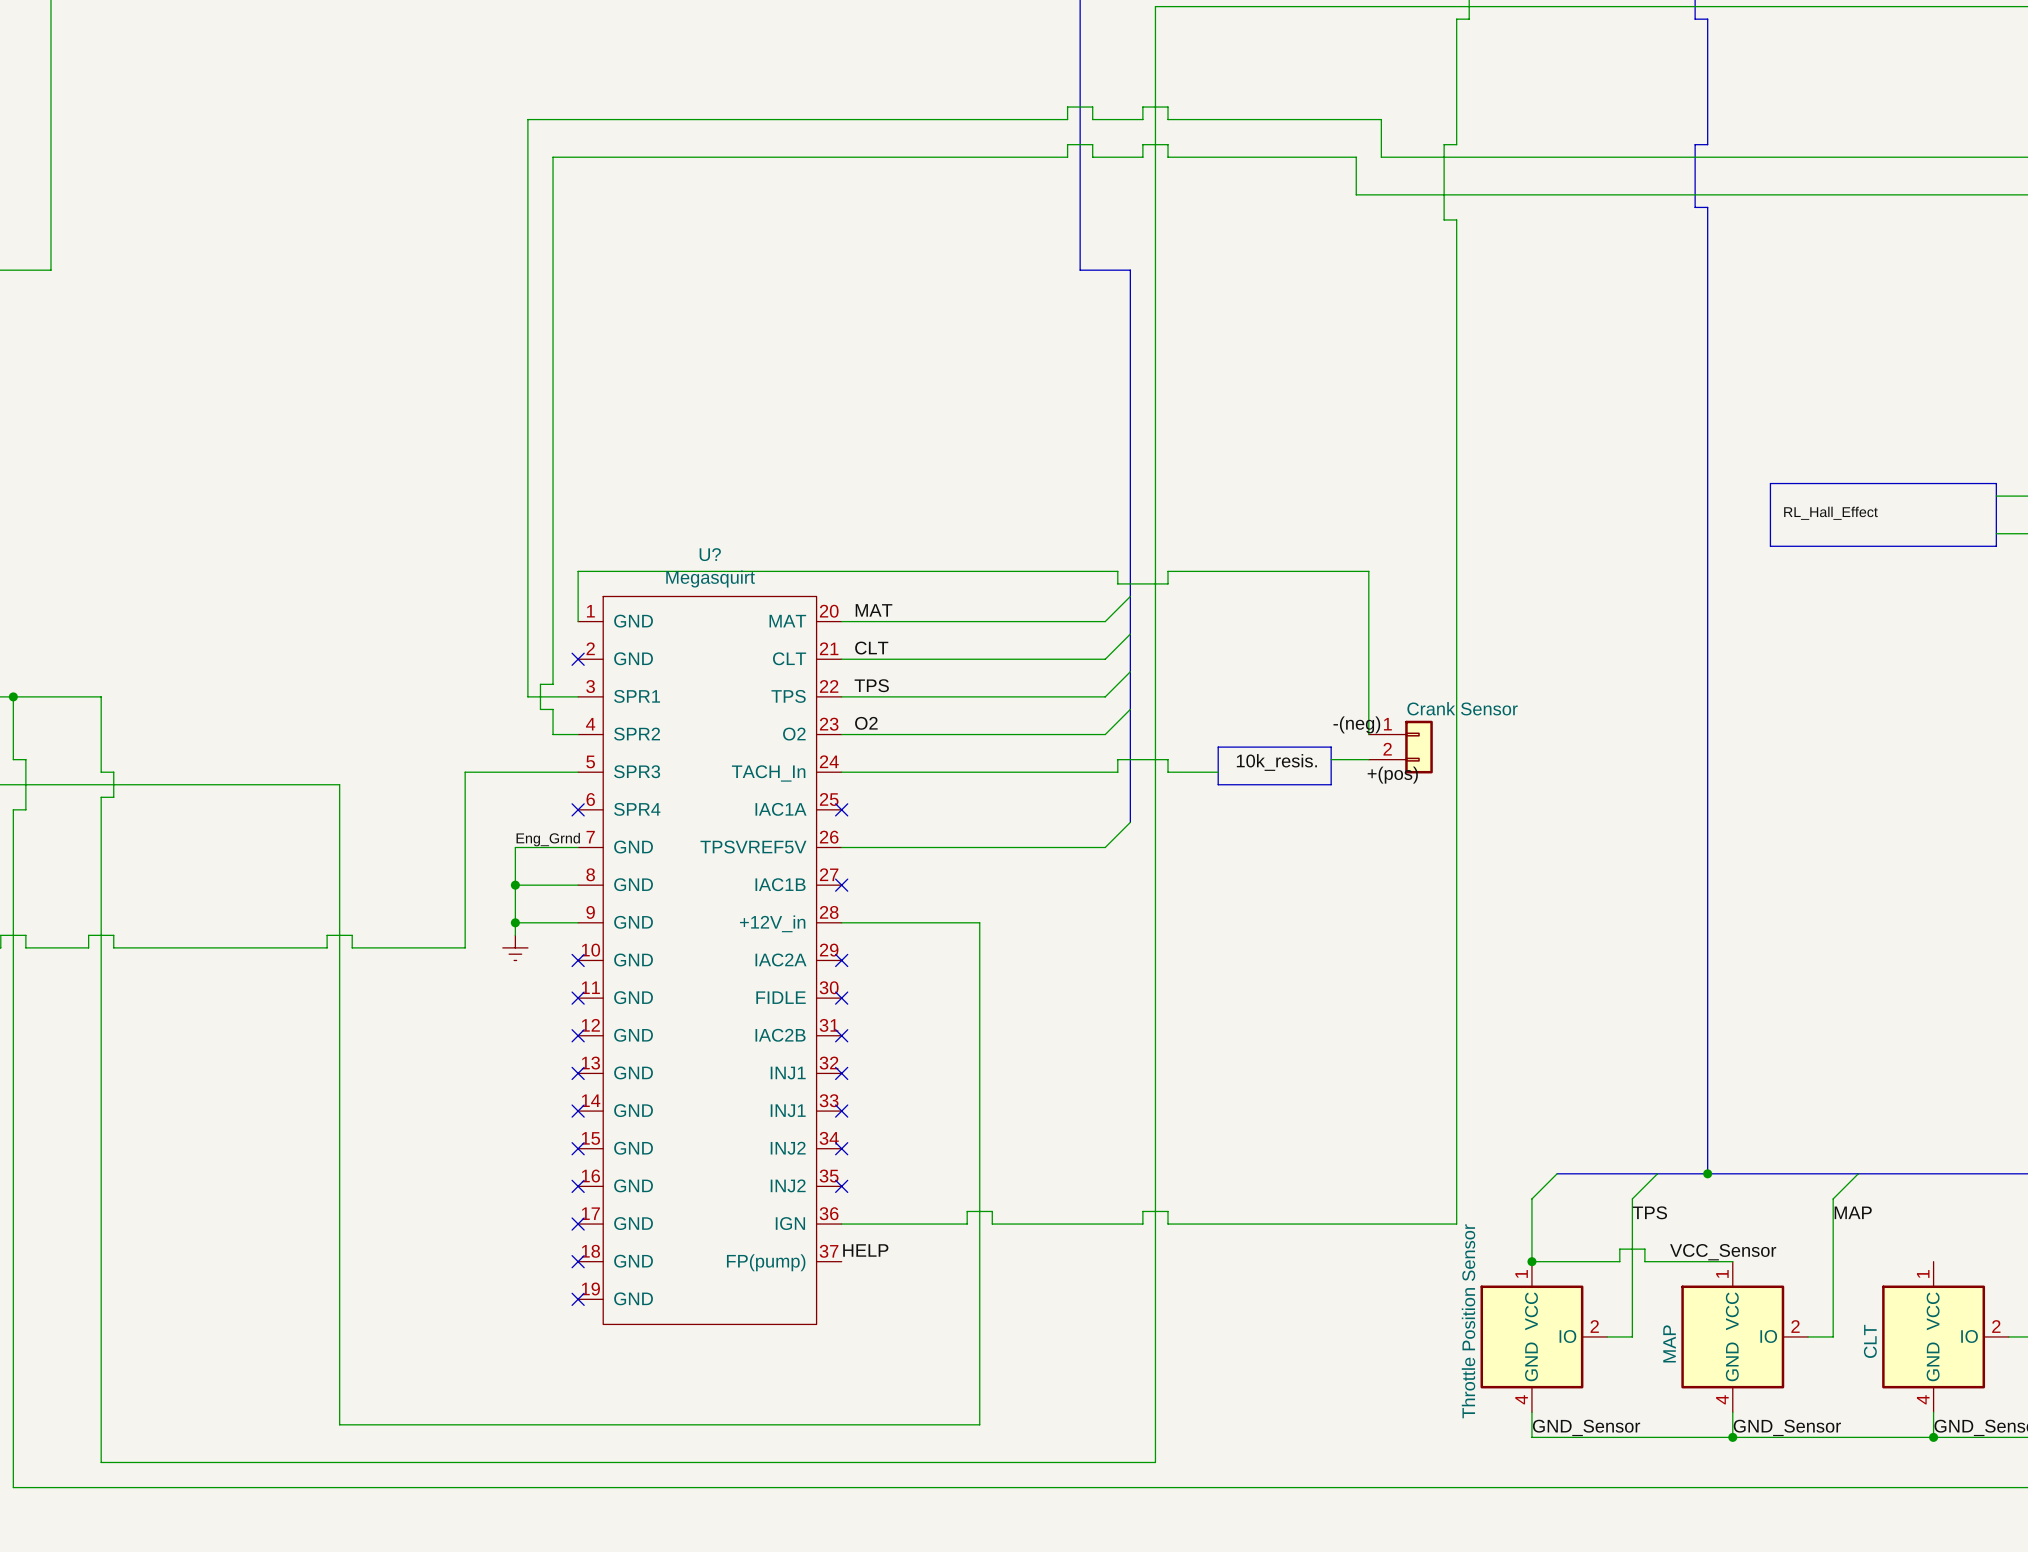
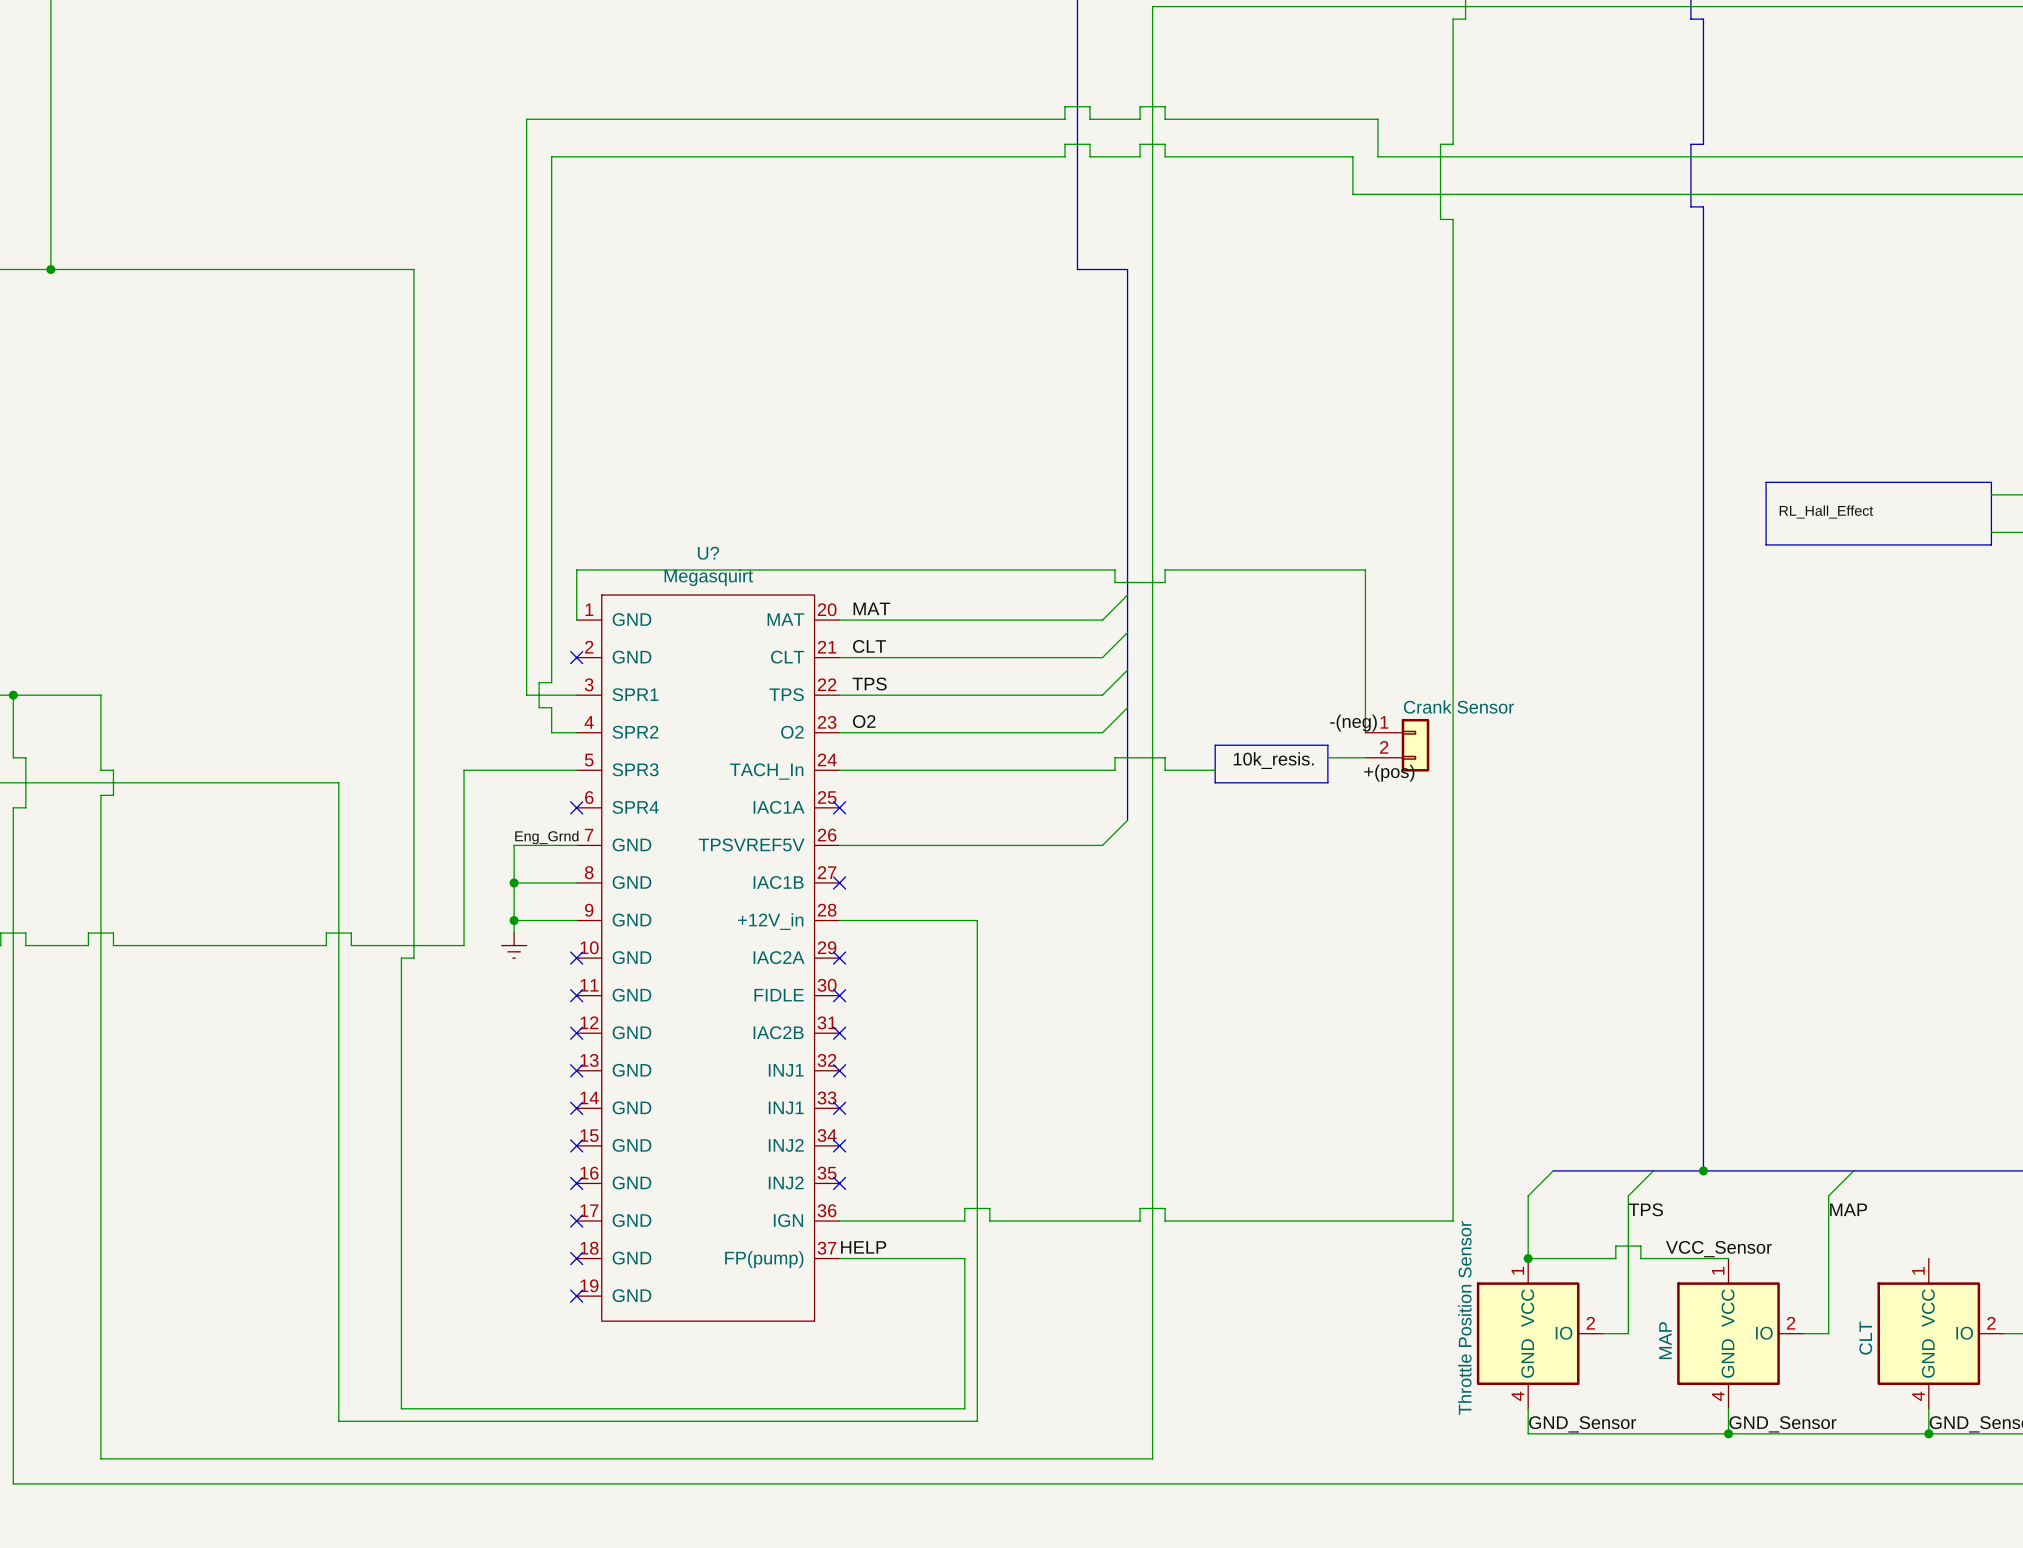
wire: none -> (50, 269) (413, 269) (413, 958) (401, 958) (401, 1408) (964, 1408) (964, 1258) (839, 1258)
junction: none -> (50, 269)

